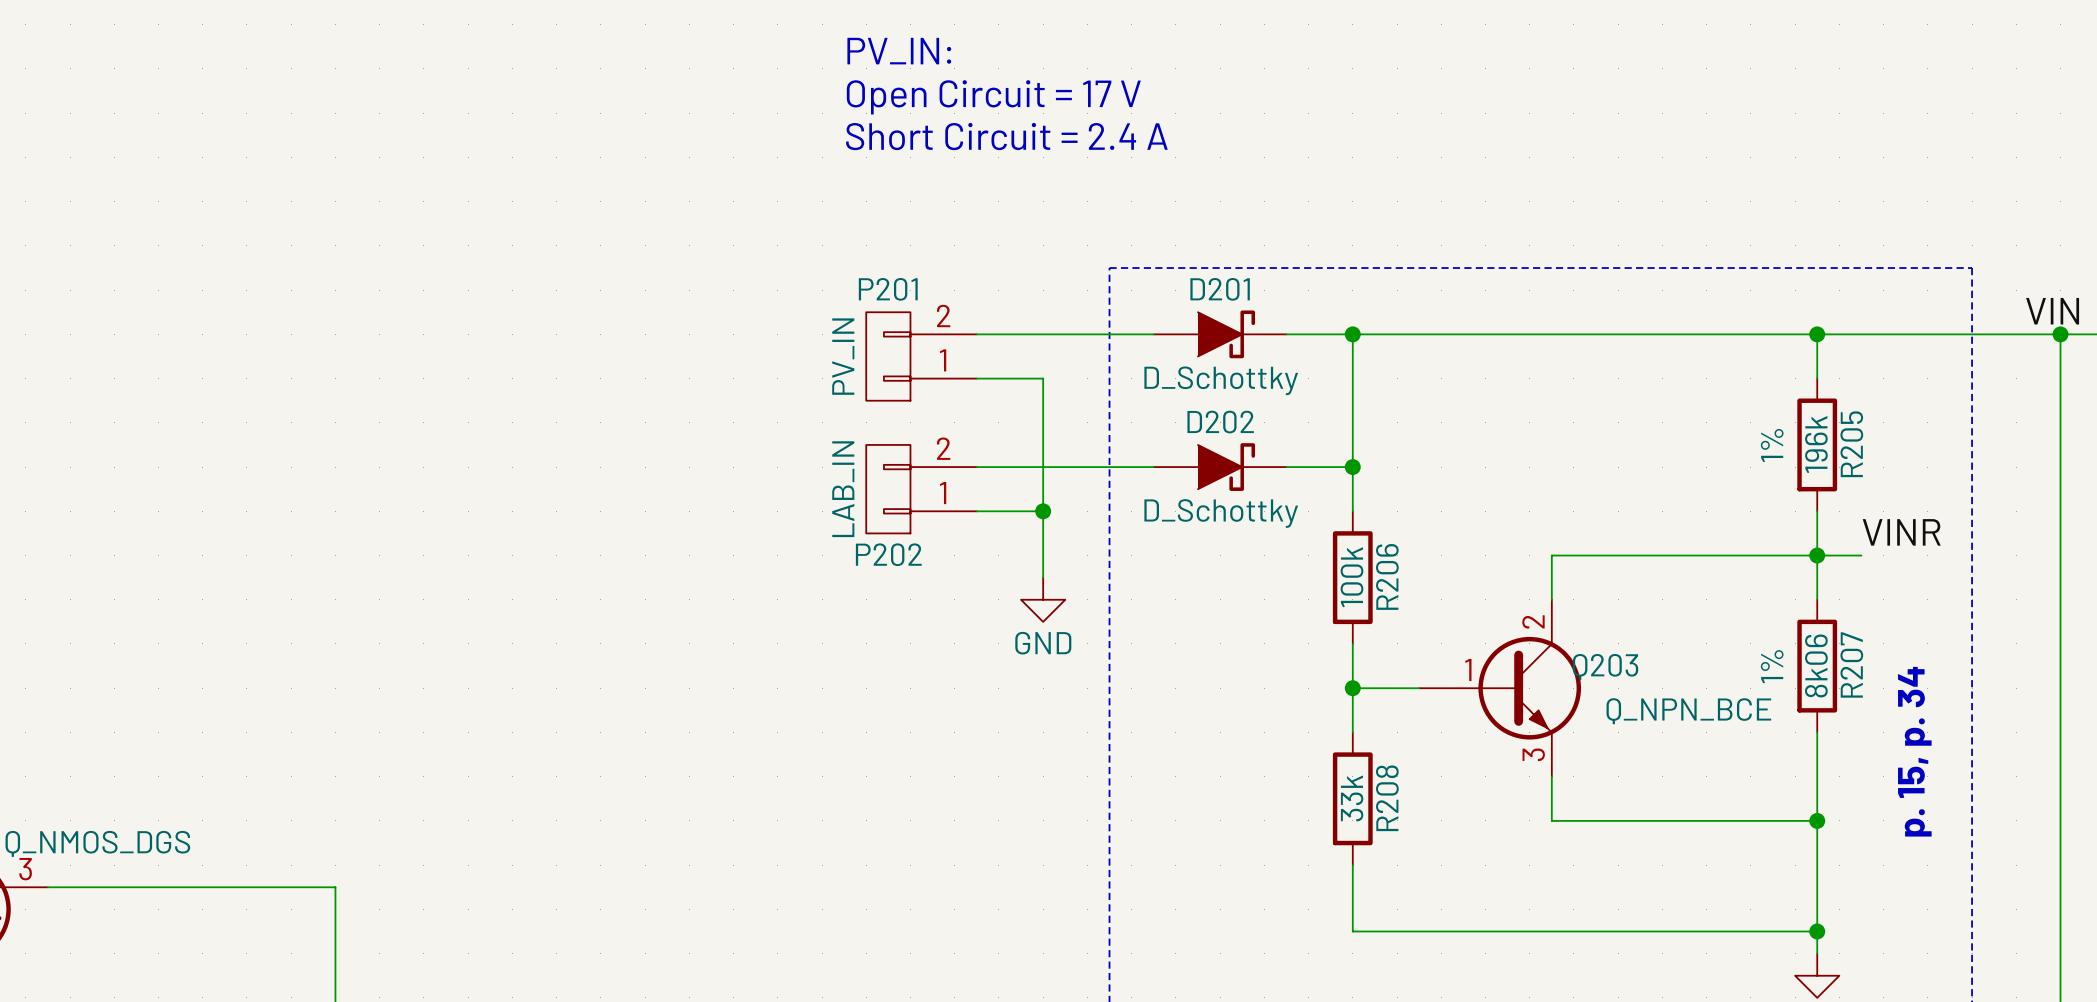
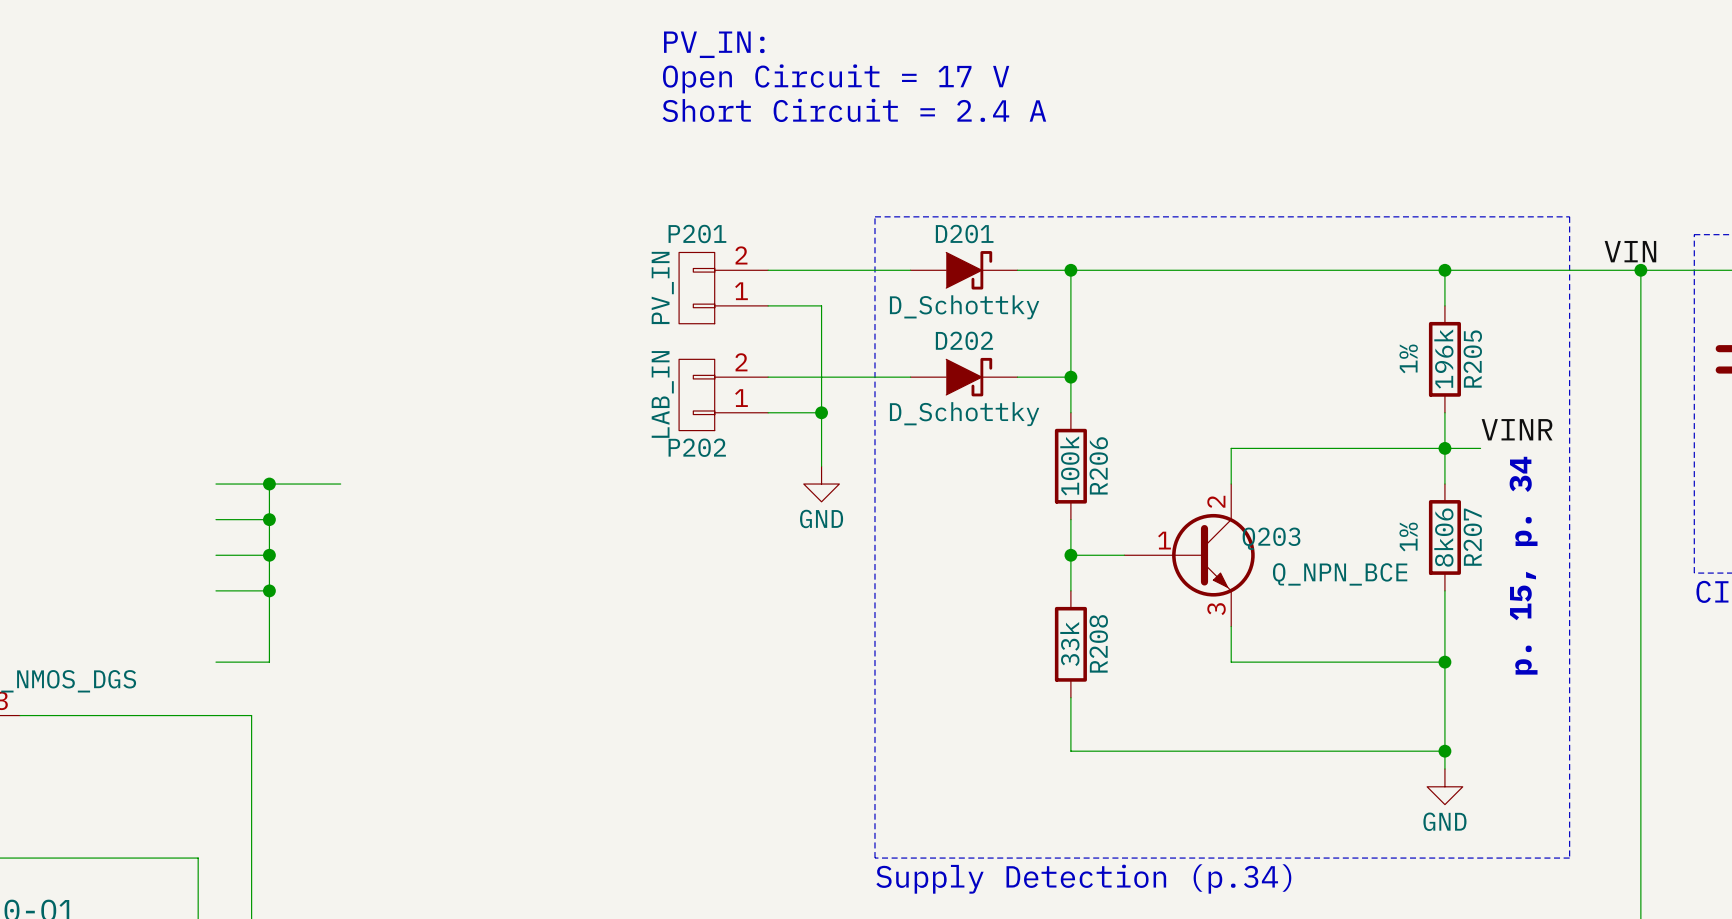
wire: none -> (215, 484) (340, 484)
wire: none -> (269, 484) (269, 662) (215, 662)
junction: none -> (269, 484)
wire: none -> (215, 519) (269, 519)
junction: none -> (269, 519)
wire: none -> (215, 555) (269, 555)
junction: none -> (269, 555)
wire: none -> (215, 590) (269, 590)
junction: none -> (269, 590)

